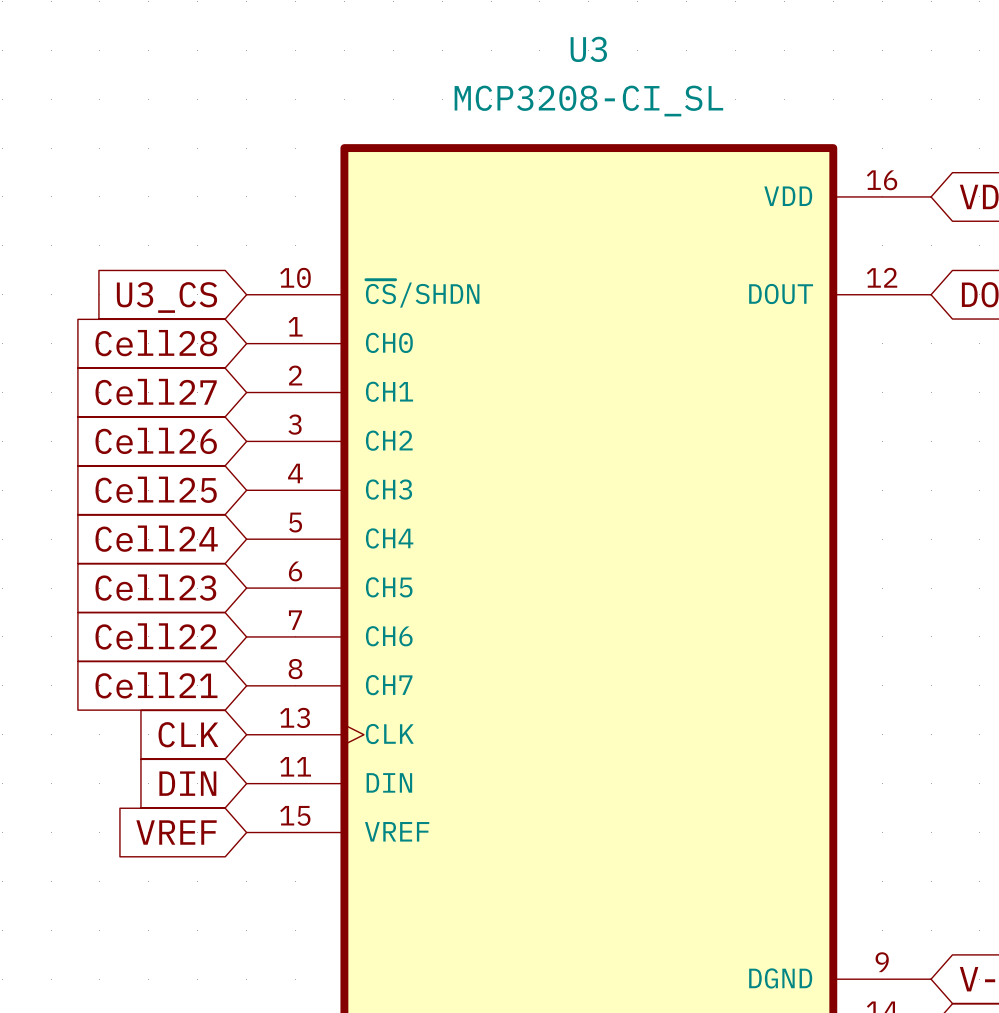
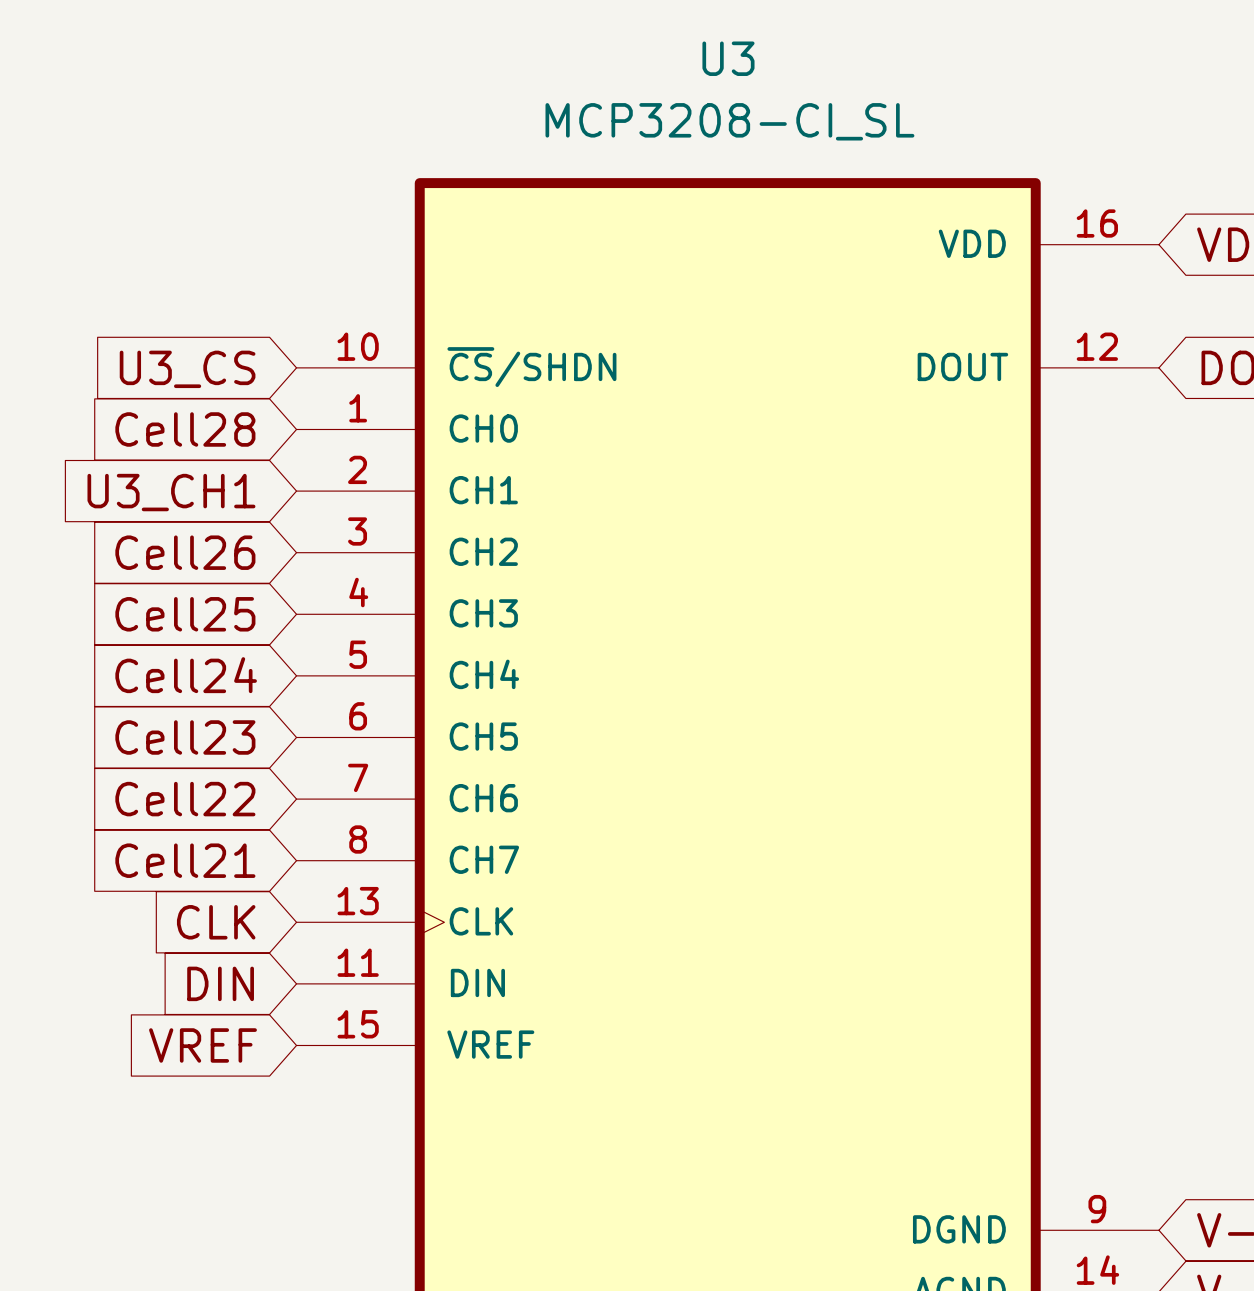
global label: Cell27 (156, 391) -> U3_CH1 (171, 492)

